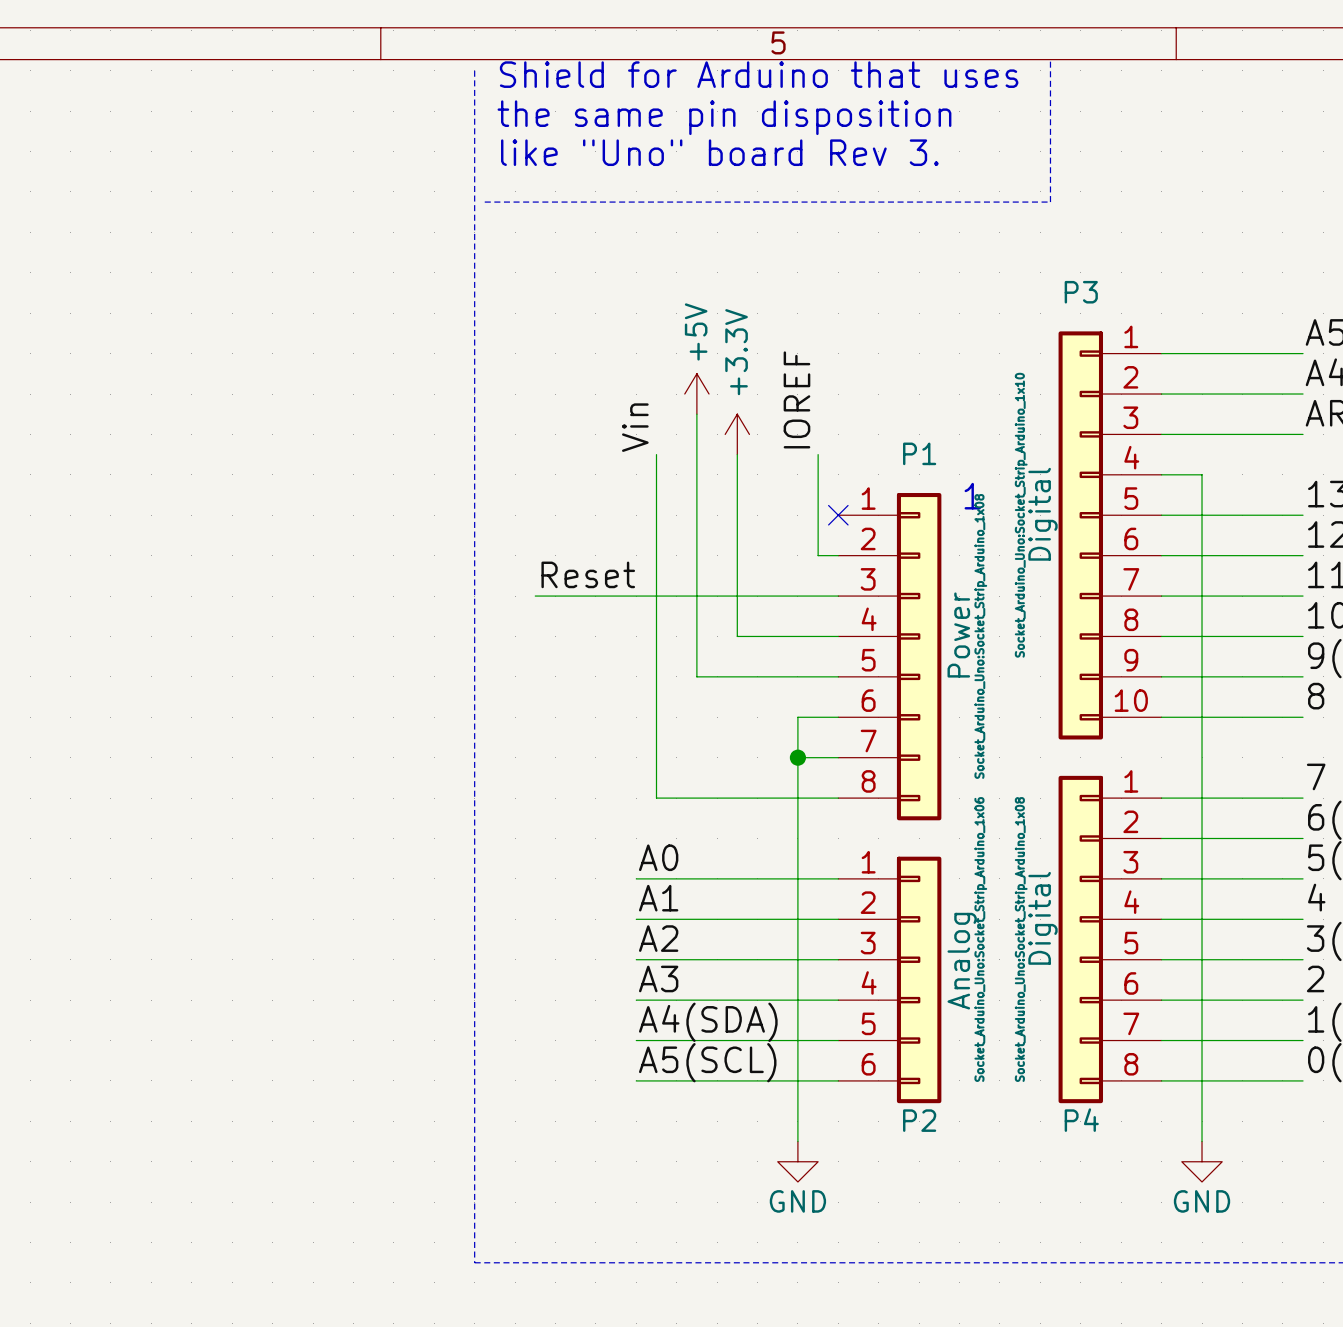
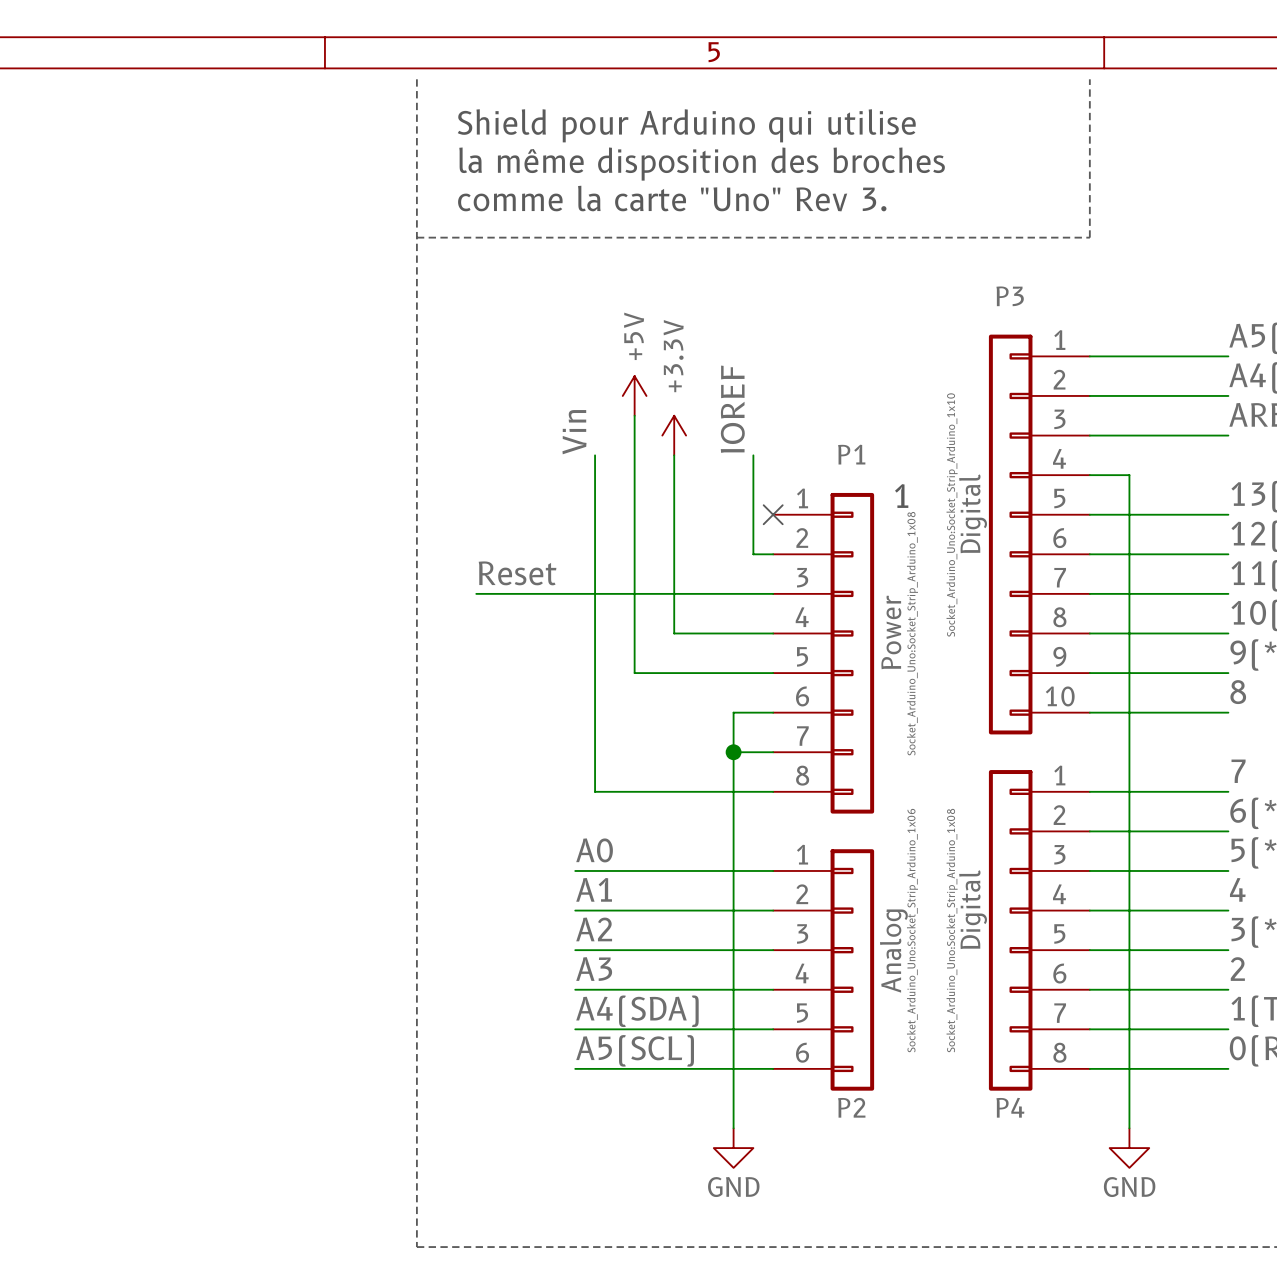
line: (1050, 60) (1050, 202) (484, 202) -> none
line: none -> (1089, 79) (1089, 237) (416, 237)
text: Shield for Arduino that uses (759, 74) -> Shield pour Arduino qui utilise (686, 125)
text: the same pin disposition (724, 117) -> none
text: like "Uno" board Rev 3. (719, 152) -> none
text: none -> la même disposition des broches (702, 164)
text: none -> comme la carte "Uno" Rev 3. (672, 198)

